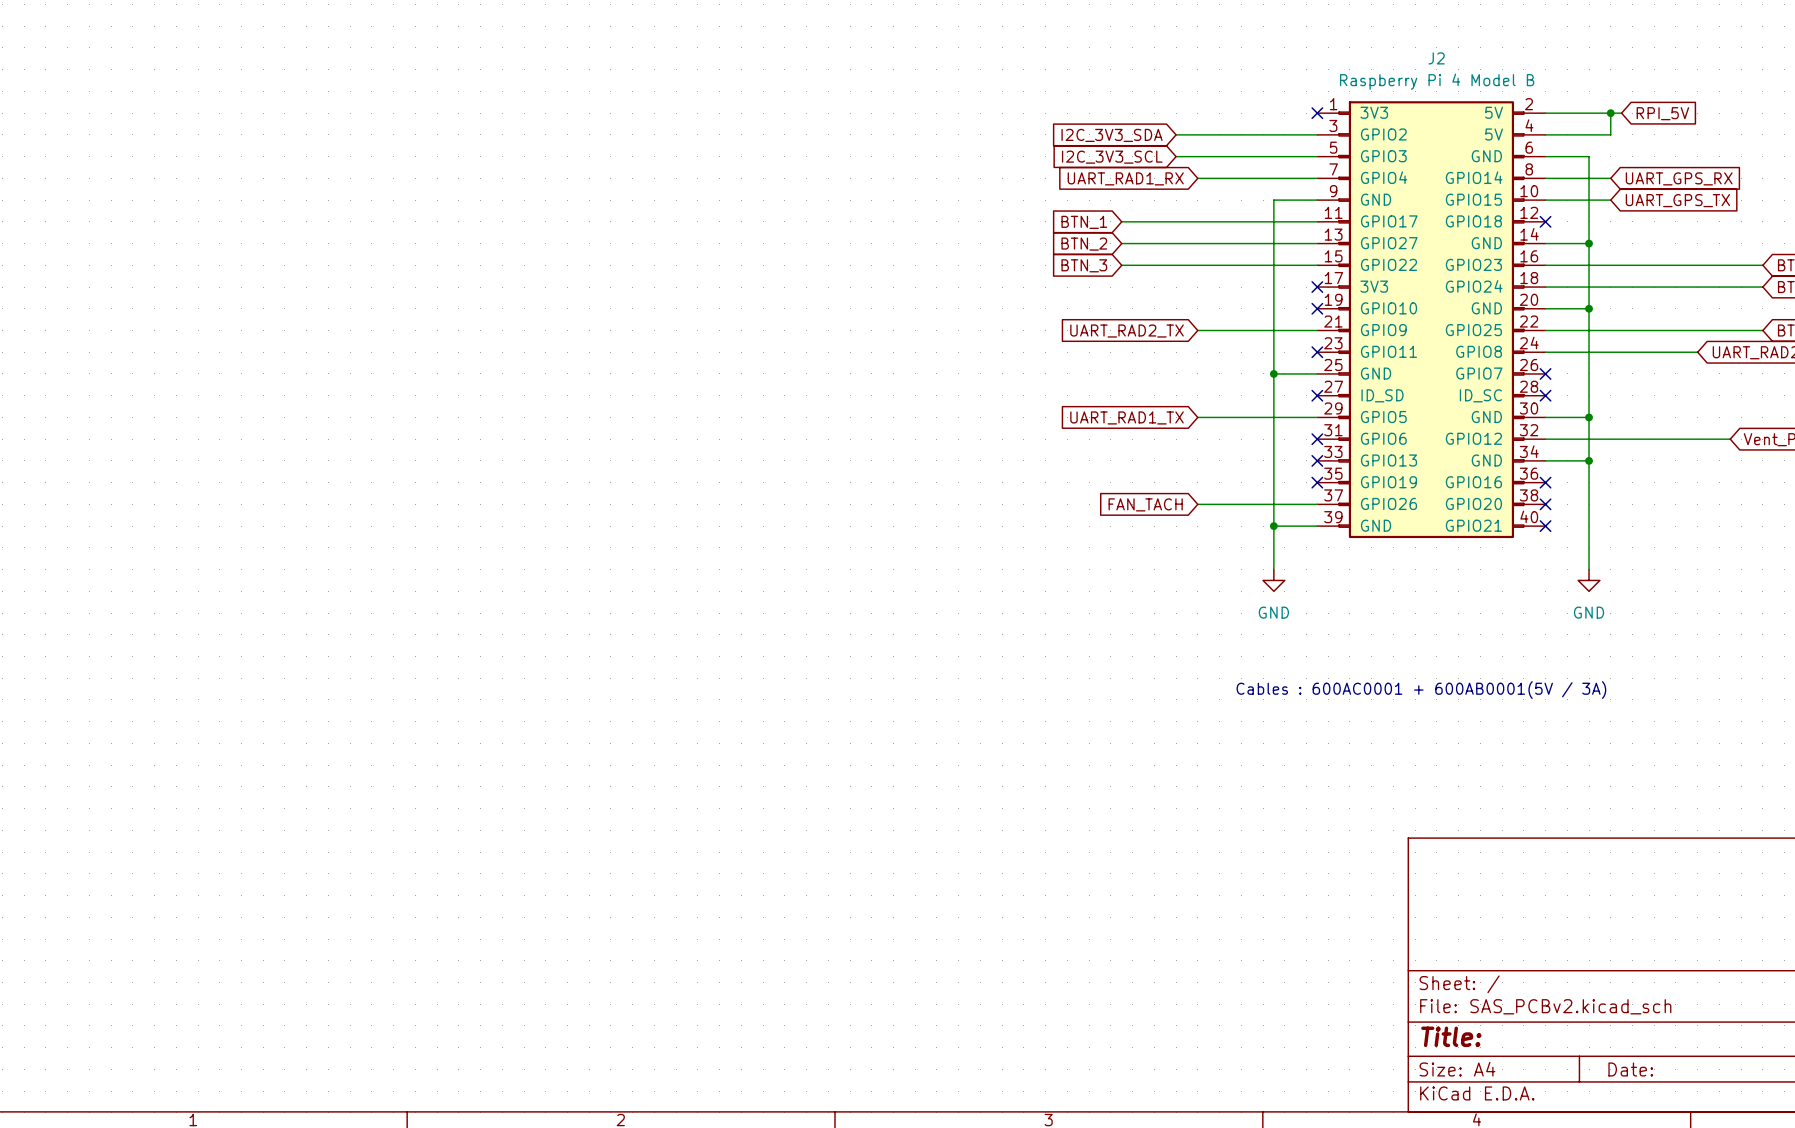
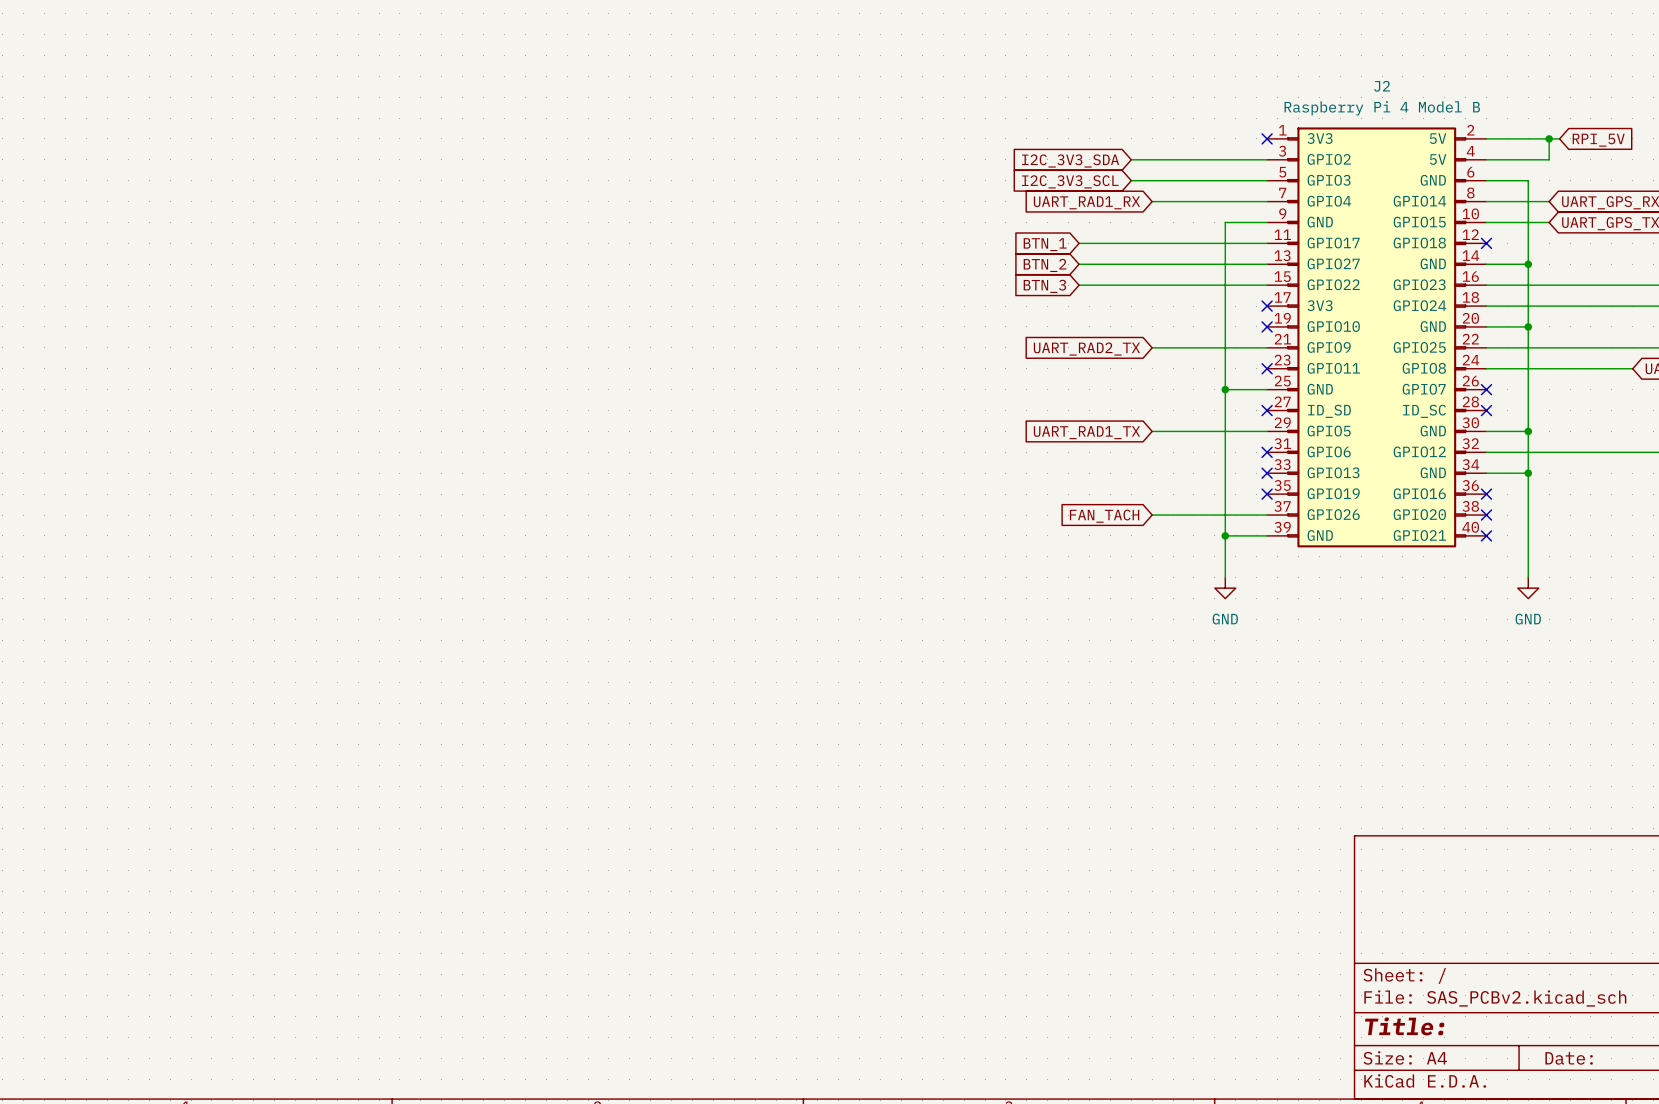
text: Cables : 600AC0001 + 600AB0001(5V / 3A) (1421, 690) -> none

